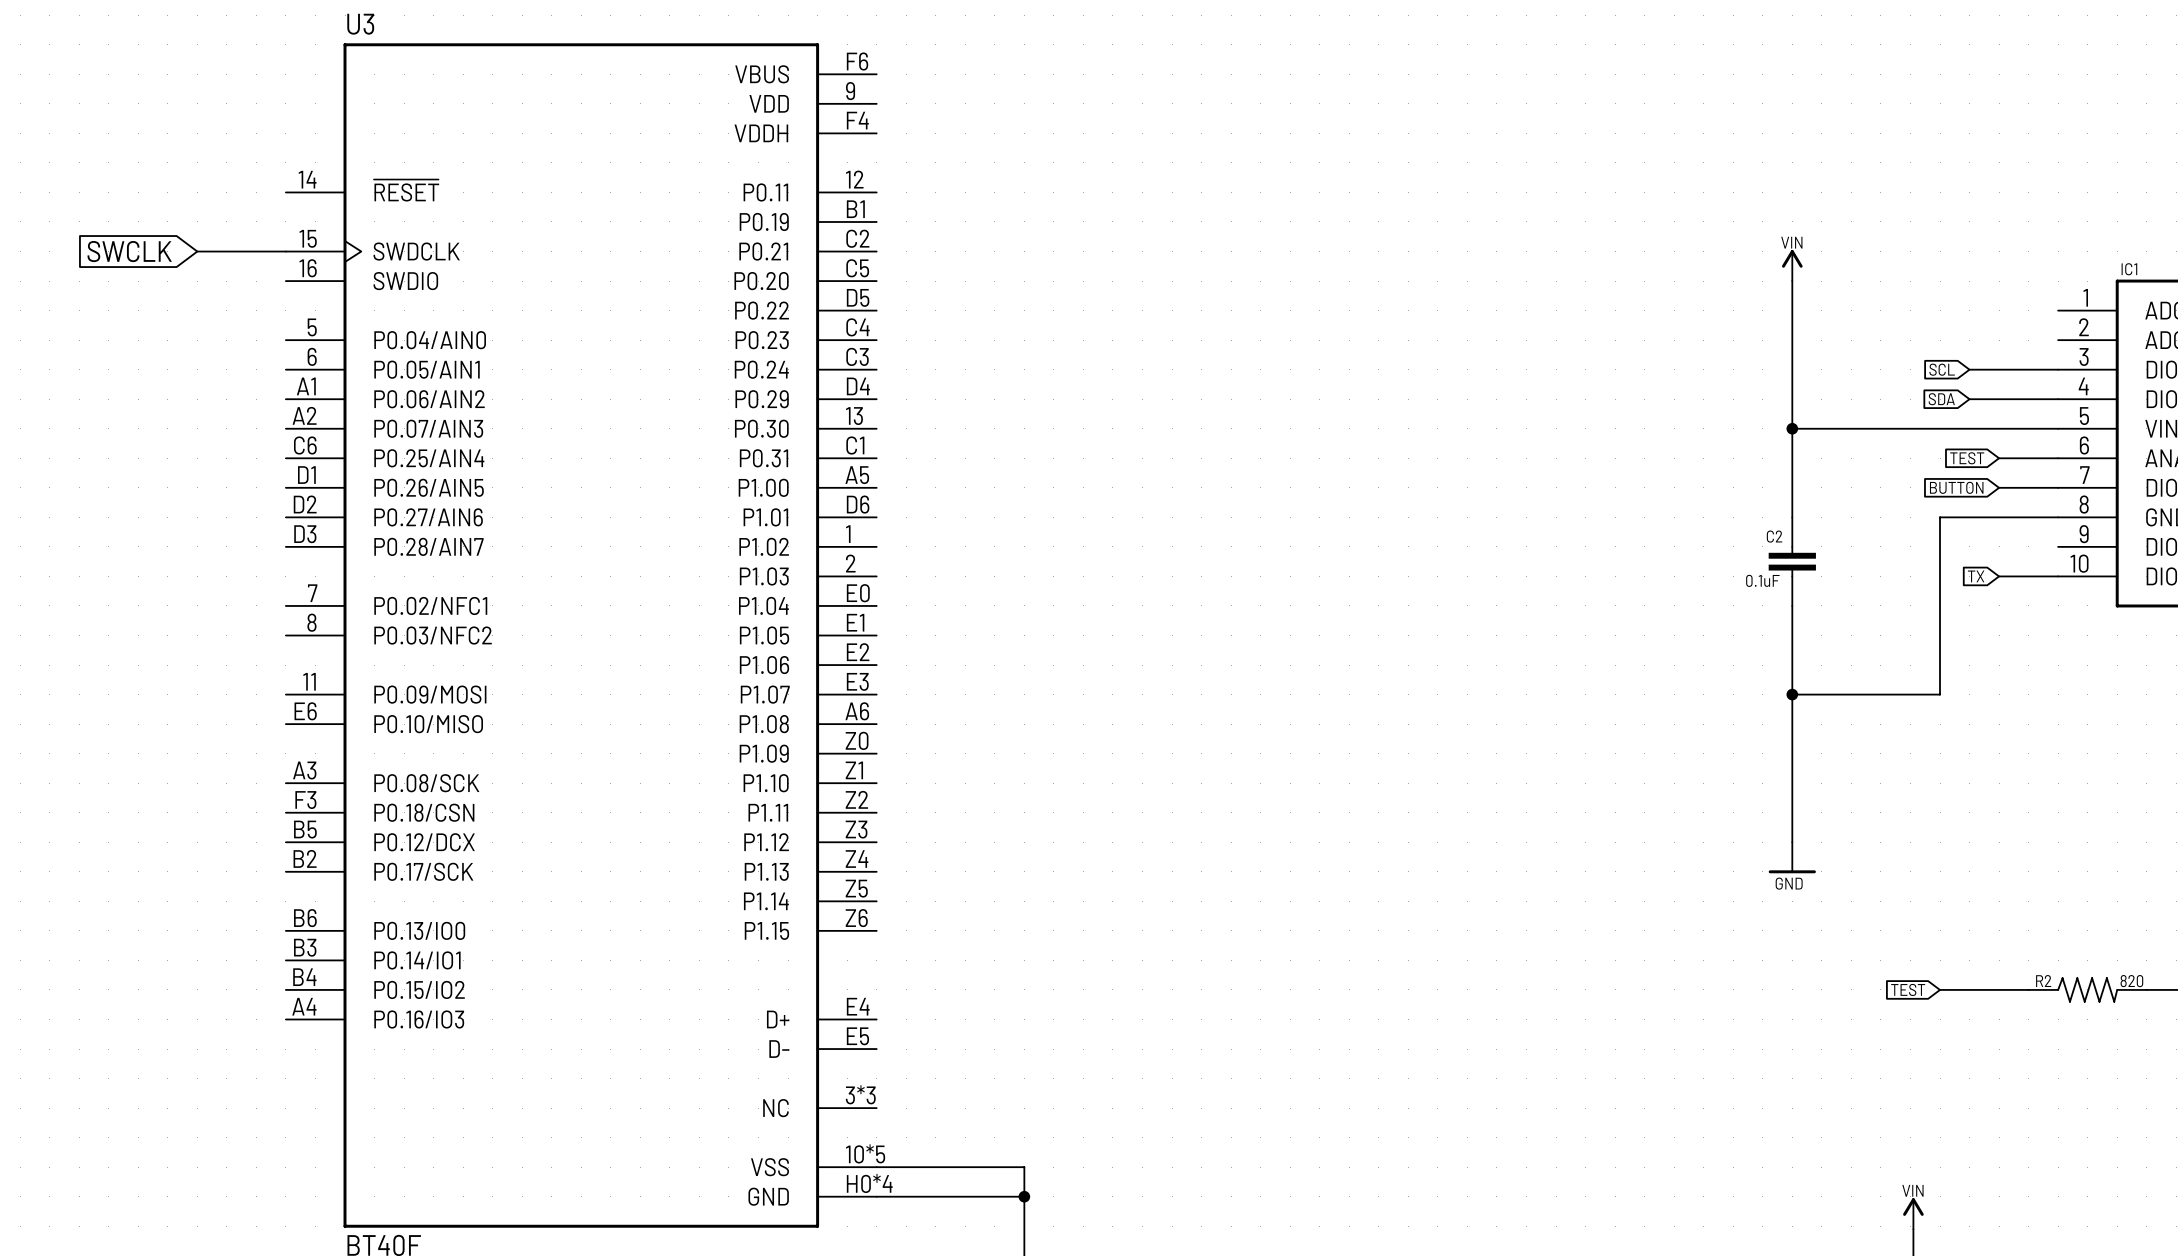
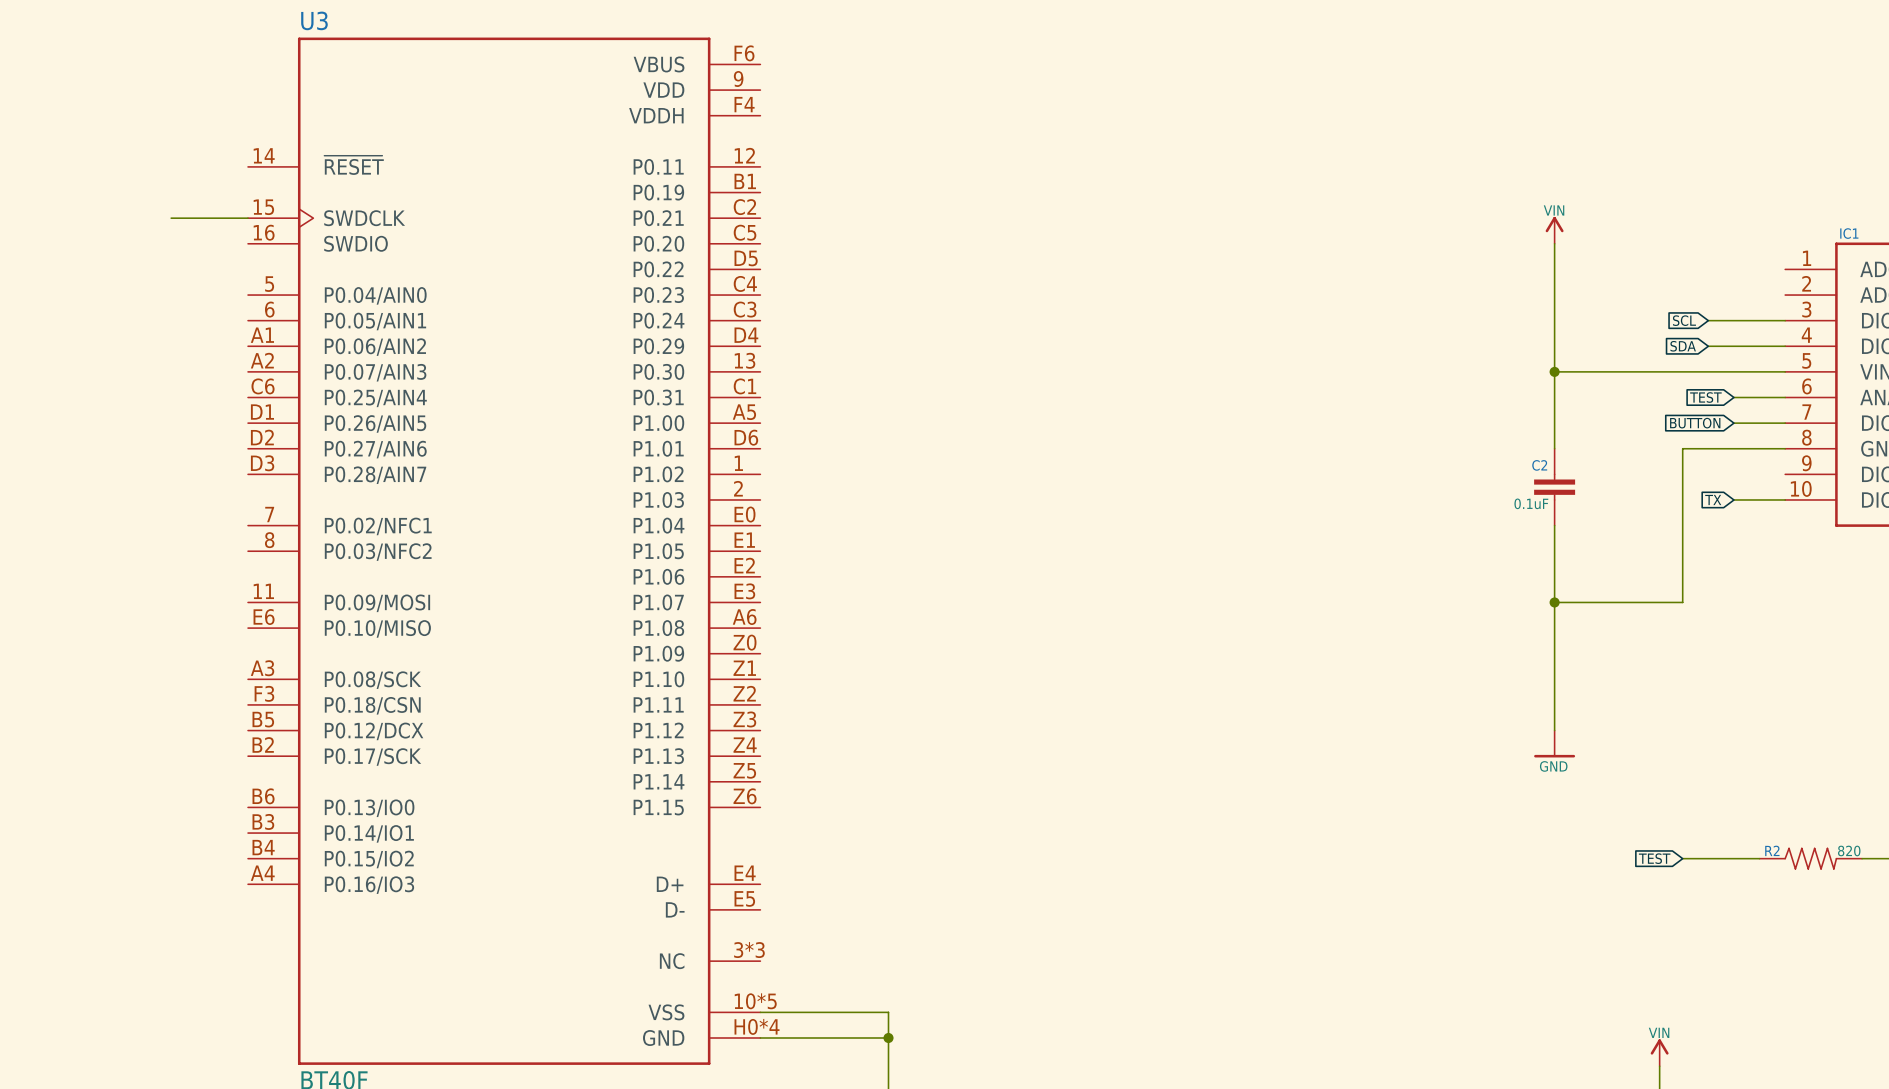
global label: SWCLK (129, 251) -> none

